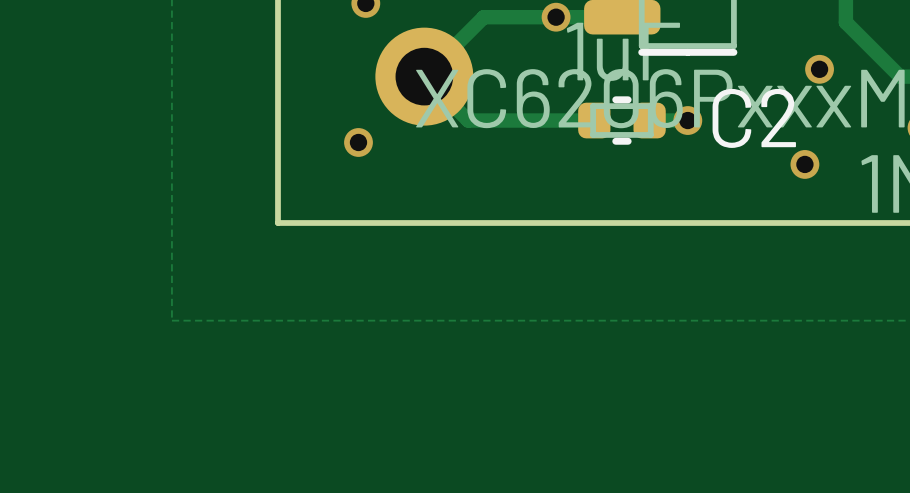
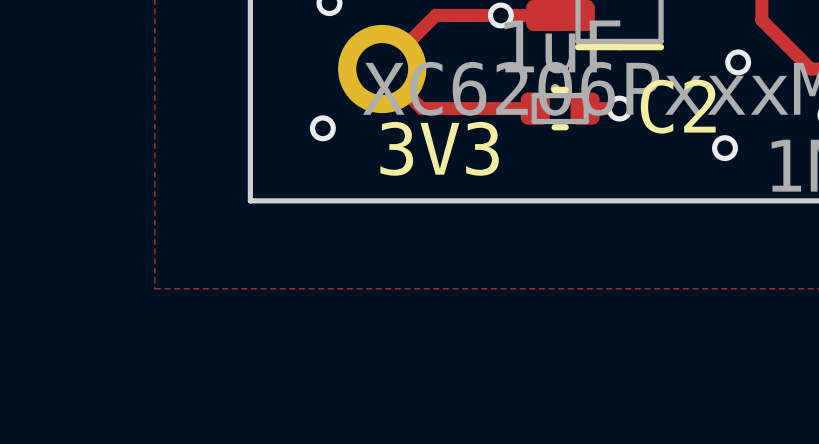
text: none -> 3V3 (439, 148)

